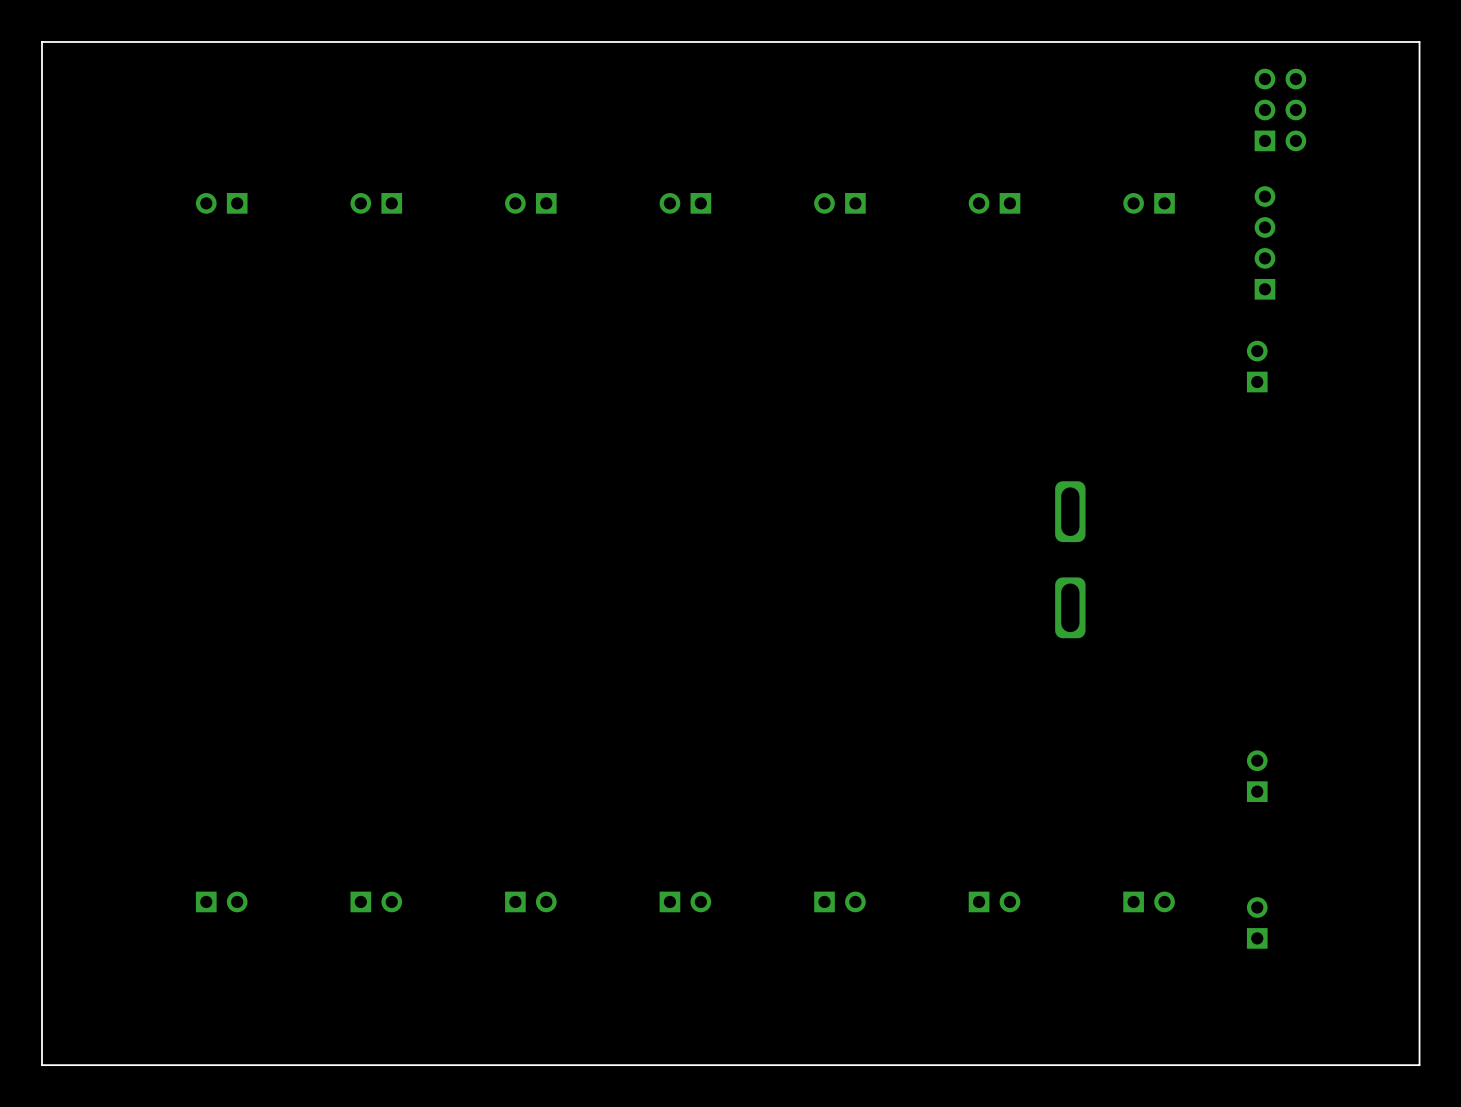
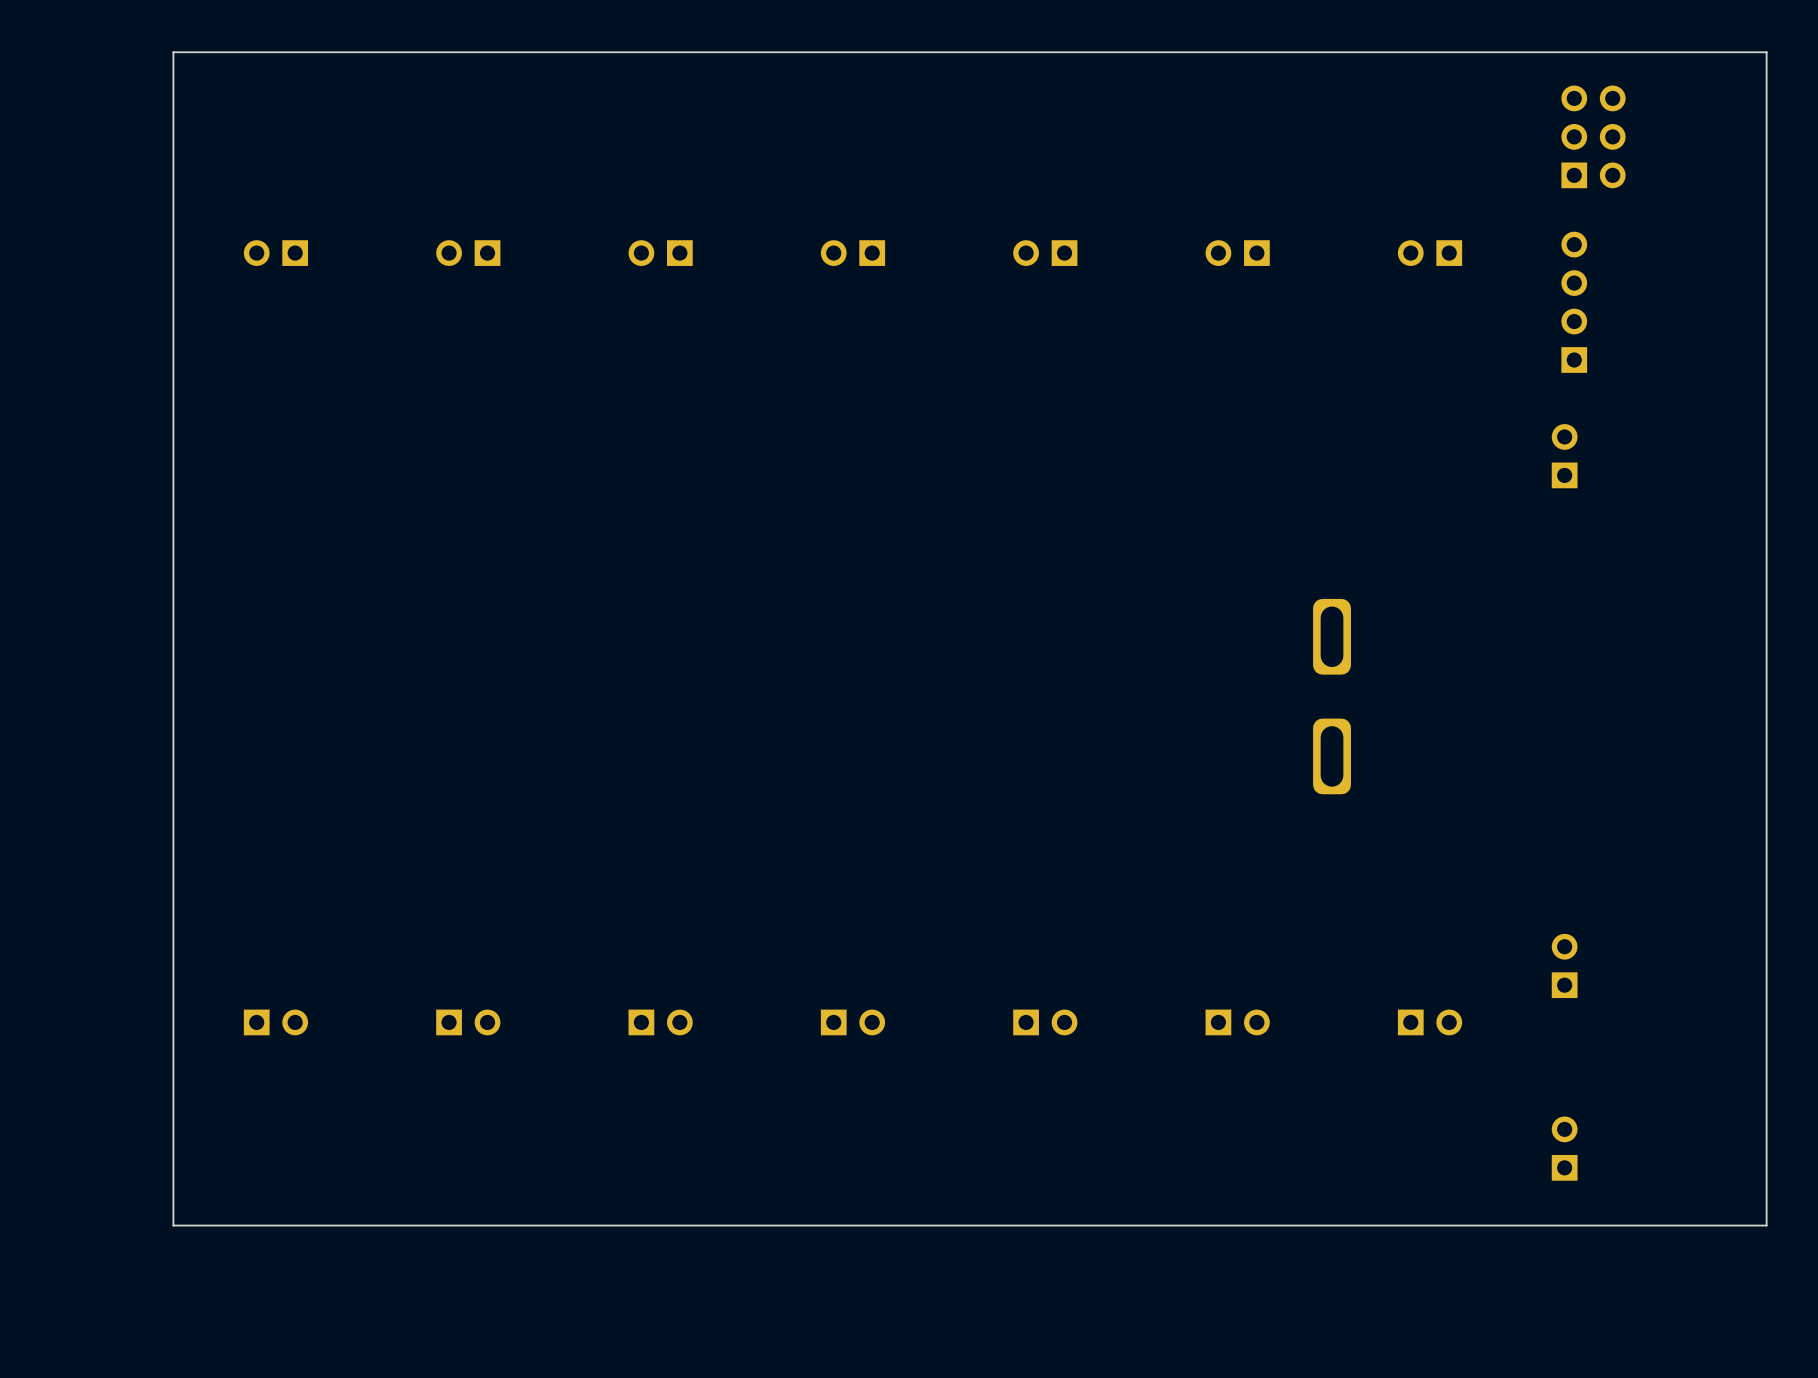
board edge: (139, 41) (41, 41) (41, 1065) (1419, 1065) (1419, 984) -> (173, 52) (173, 1225) (1766, 1225)
part position: (221, 901) -> (275, 1022)
part position: (376, 901) -> (468, 1022)
part position: (530, 901) -> (660, 1022)
part position: (685, 901) -> (852, 1022)
part position: (839, 901) -> (1045, 1022)
part position: (994, 901) -> (1237, 1022)
part position: (1149, 901) -> (1430, 1022)

